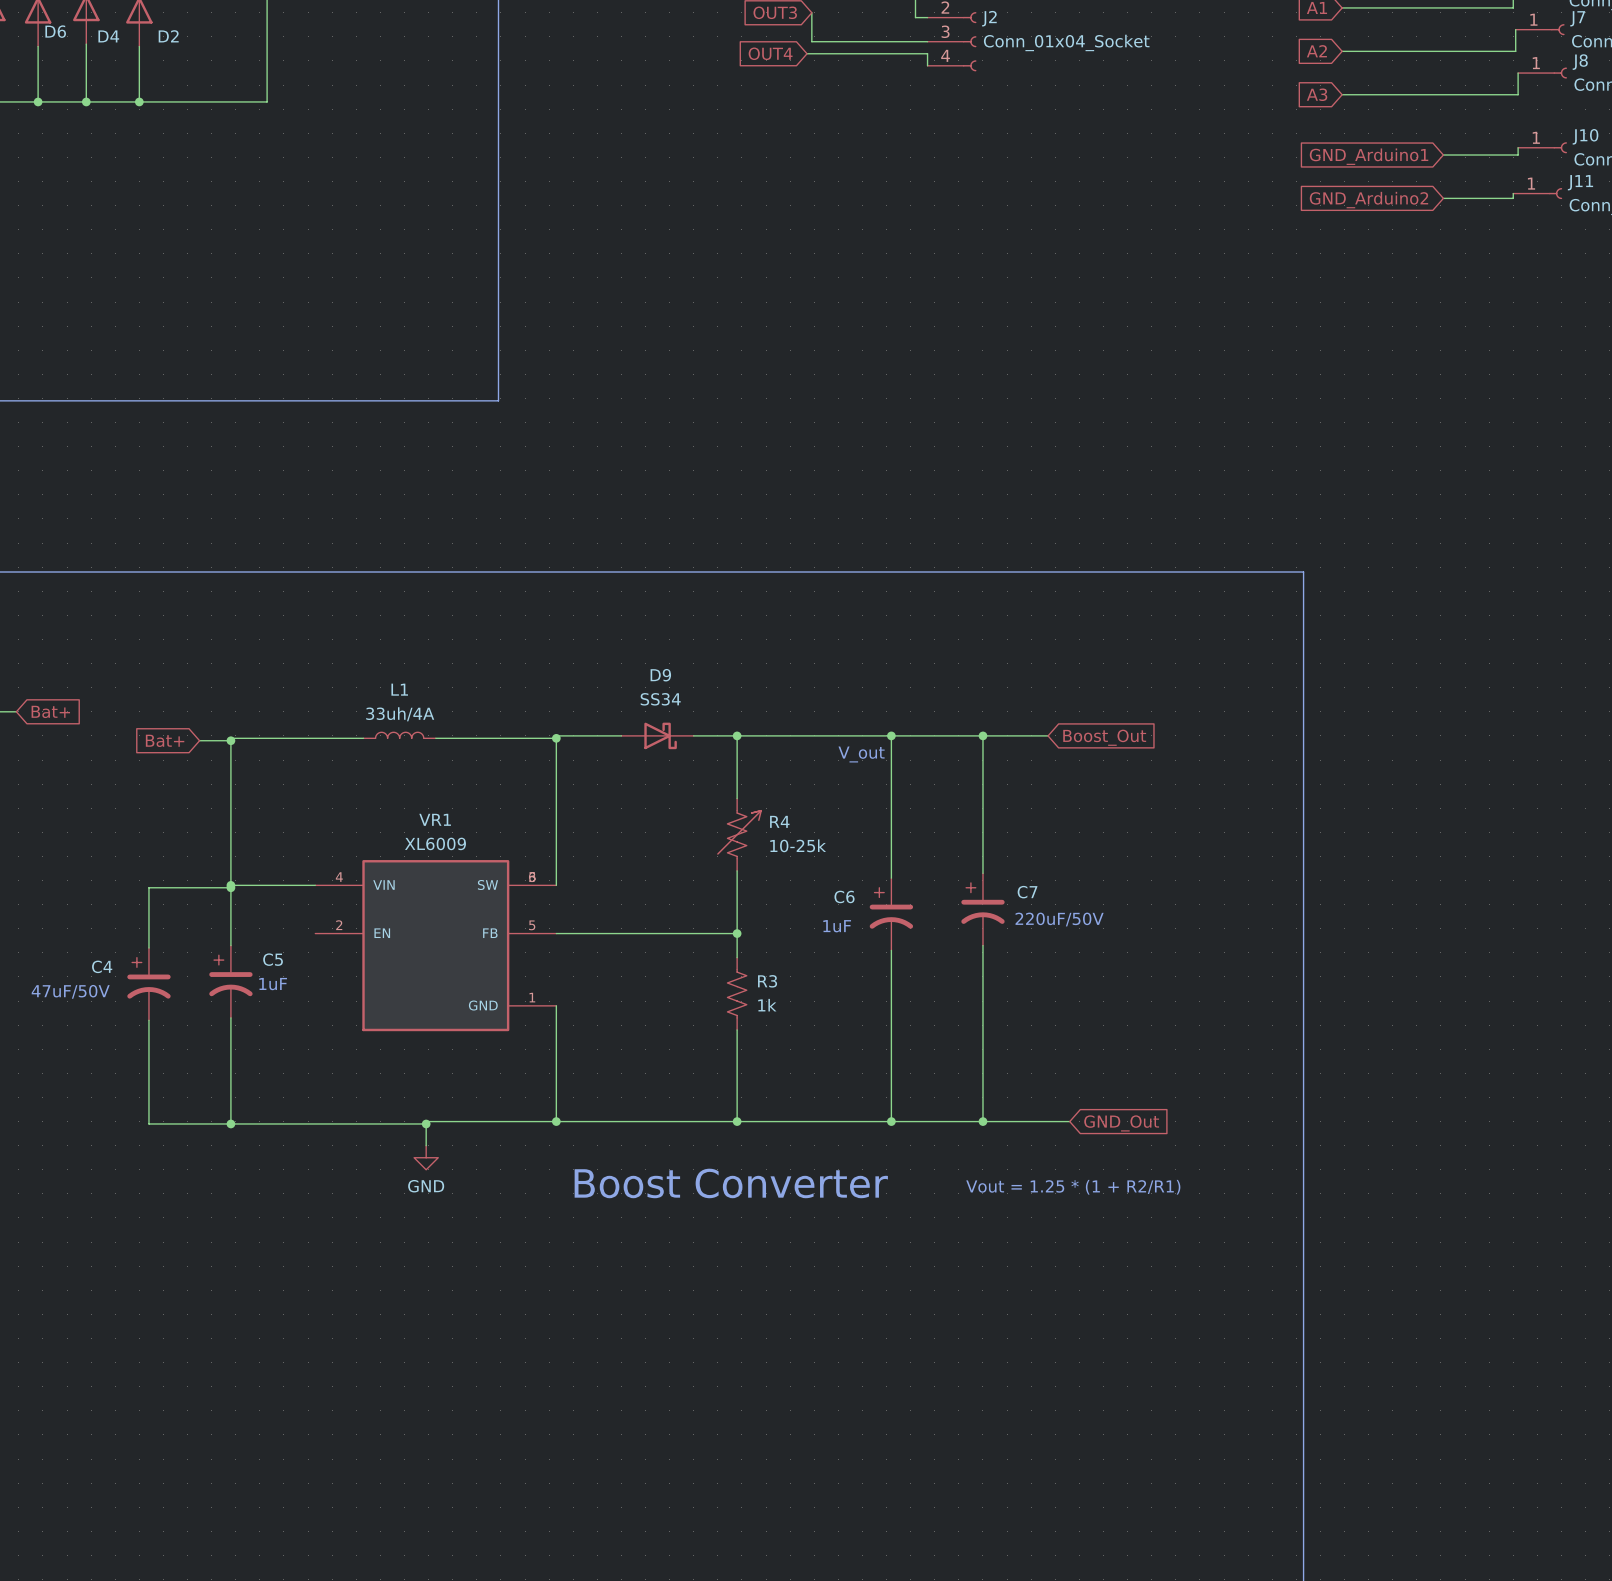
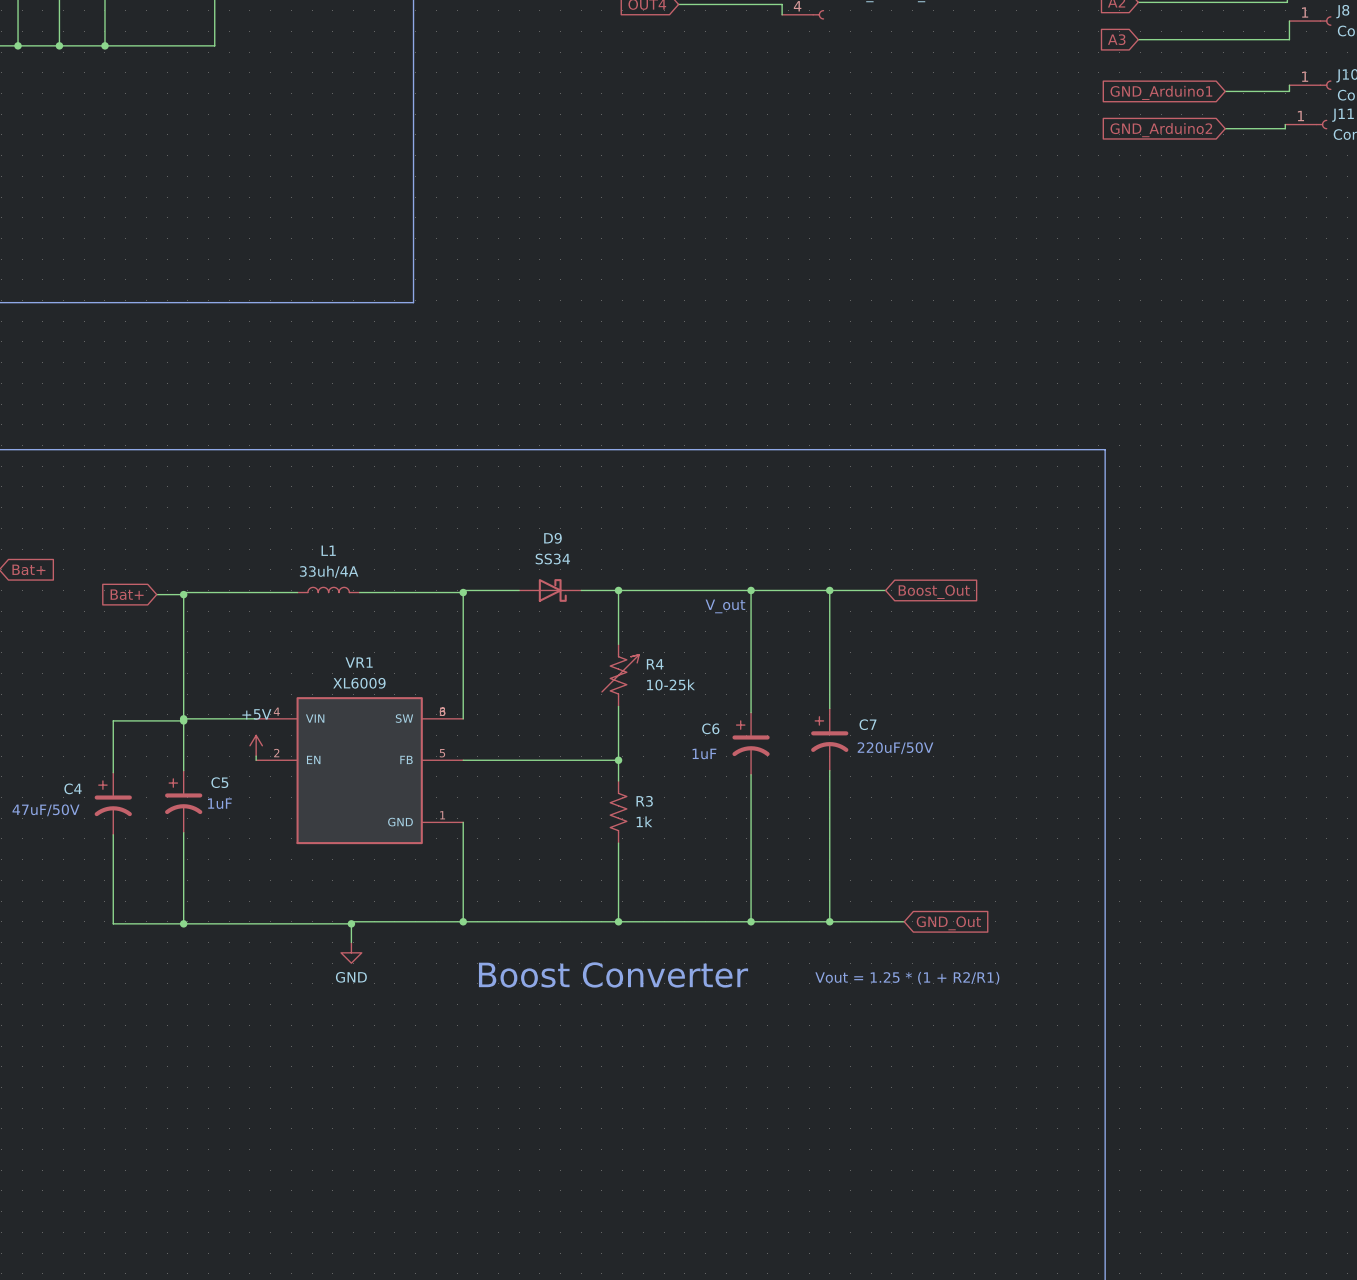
power symbol: none -> +5V (256, 745)
wire: none -> (256, 756) (256, 760)

